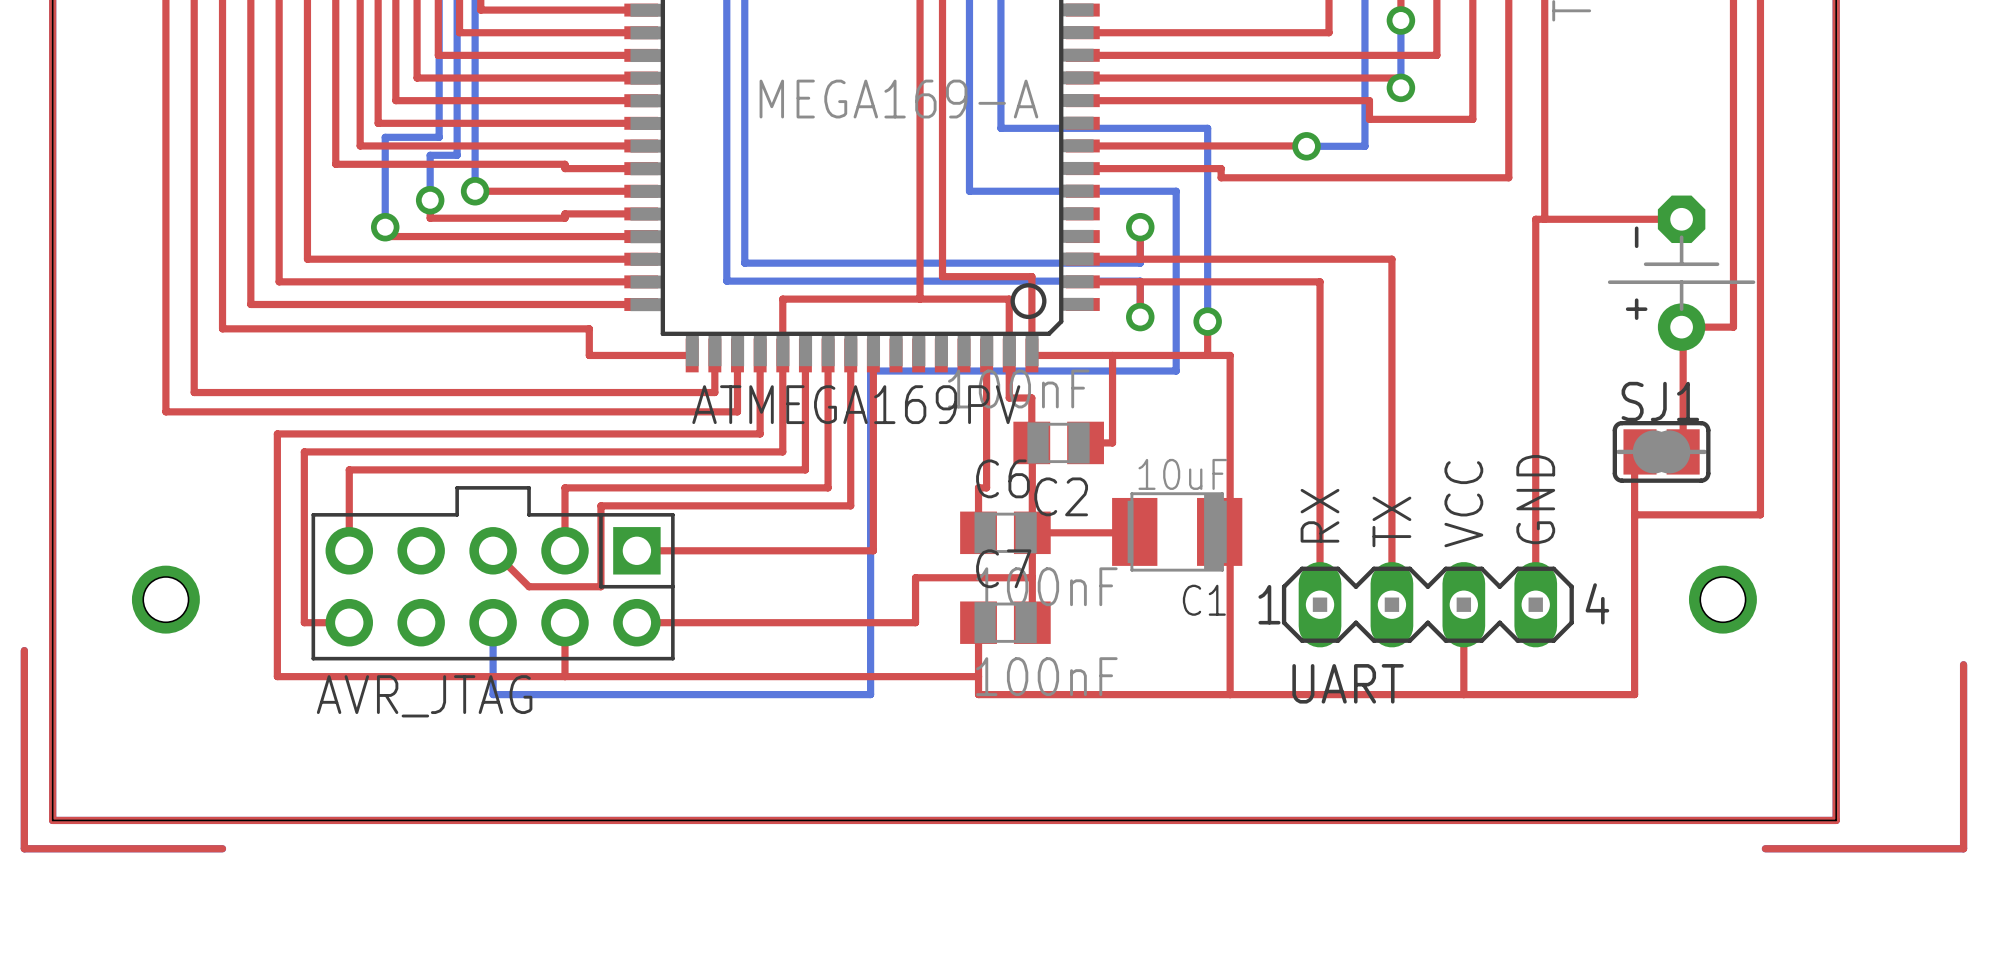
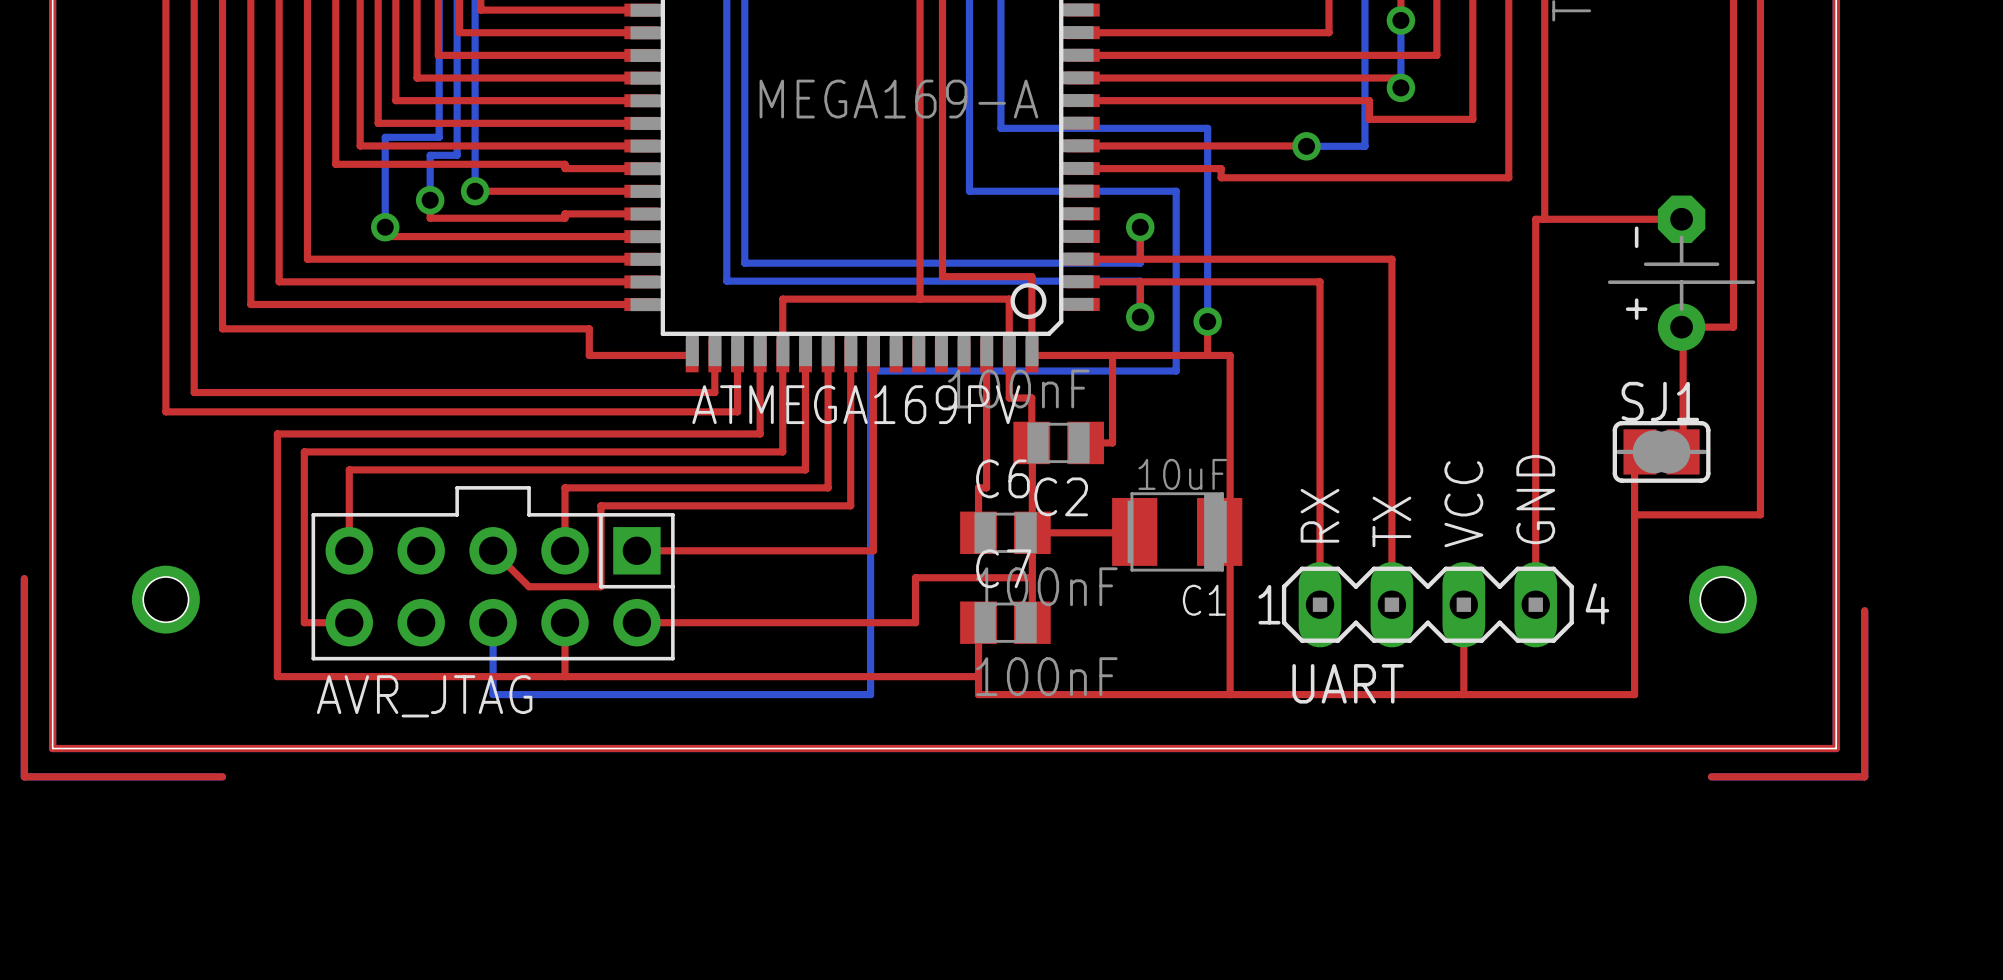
top track: none -> (24, 578) (24, 650)
top track: none -> (1864, 610) (1864, 776) (1711, 776)
top track: (1963, 664) (1963, 848) (1765, 848) -> none
board edge: (52, 748) (52, 820) (1836, 820) (1836, 748) -> (52, 748) (1836, 748)
top track: (52, 748) (52, 820) (1836, 820) (1836, 748) -> (52, 748) (1836, 748)
top track: (24, 776) (24, 848) (222, 848) -> (24, 776) (222, 776)

